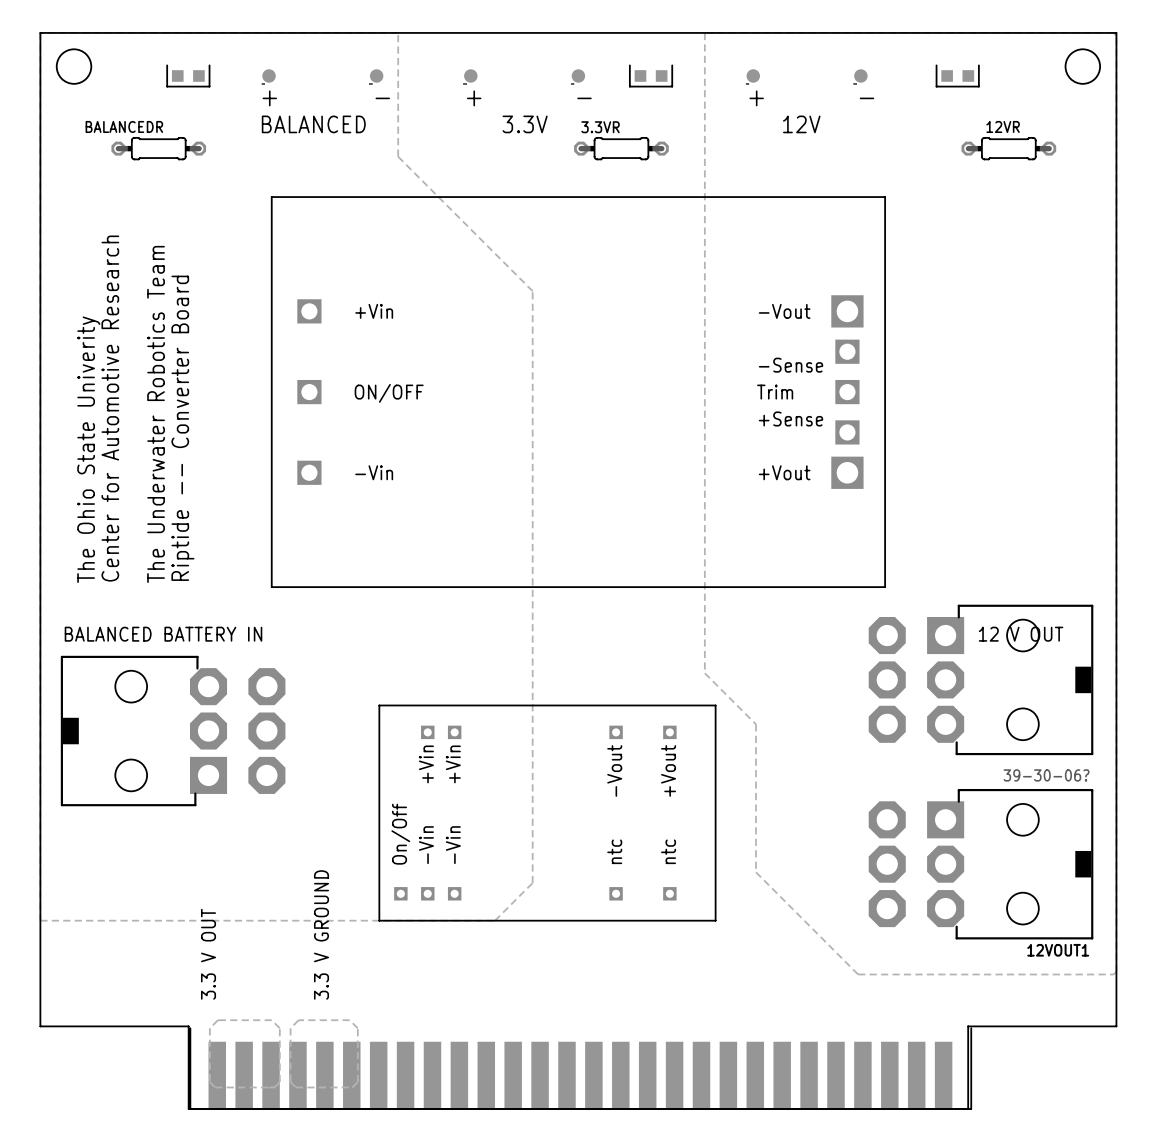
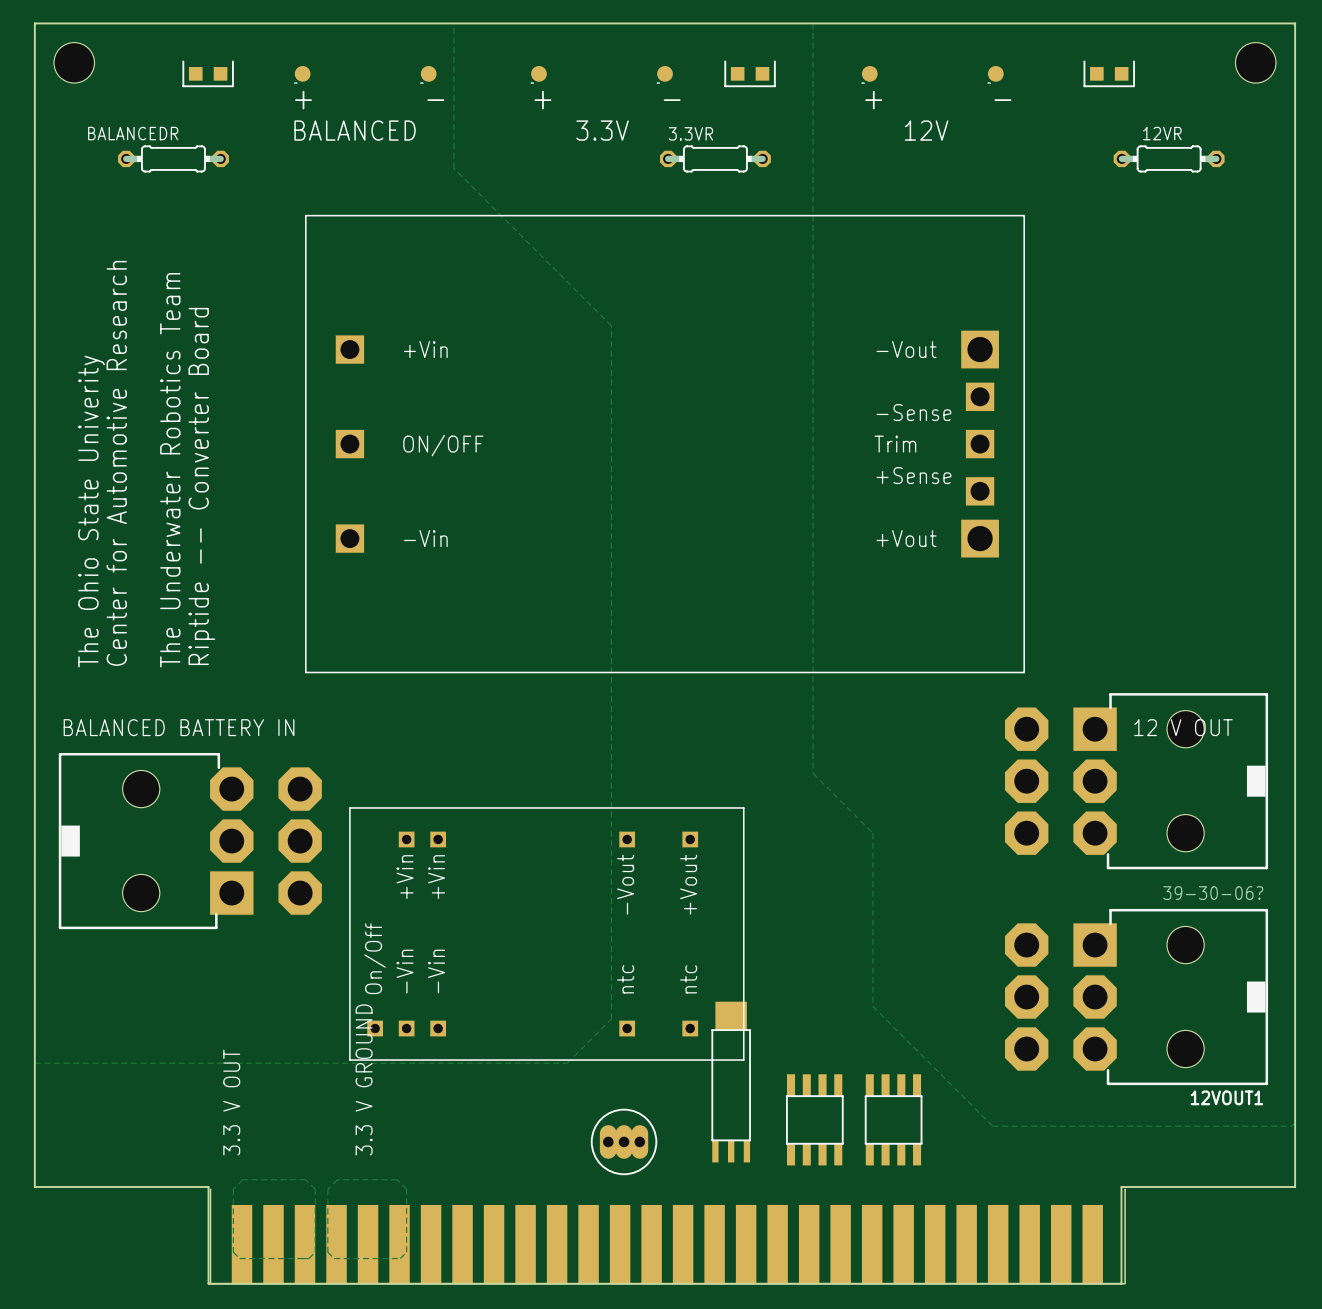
part position: (547, 813) -> (546, 934)
part: none -> (731, 1082)
part: none -> (814, 1119)
part: none -> (893, 1119)
part: none -> (624, 1141)

